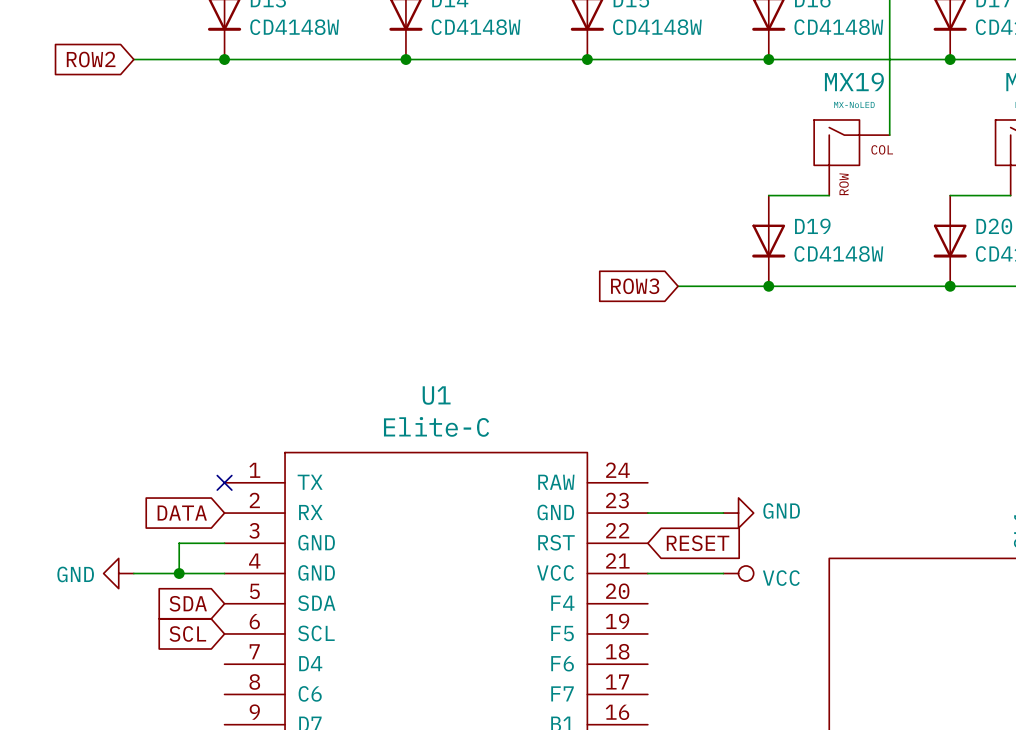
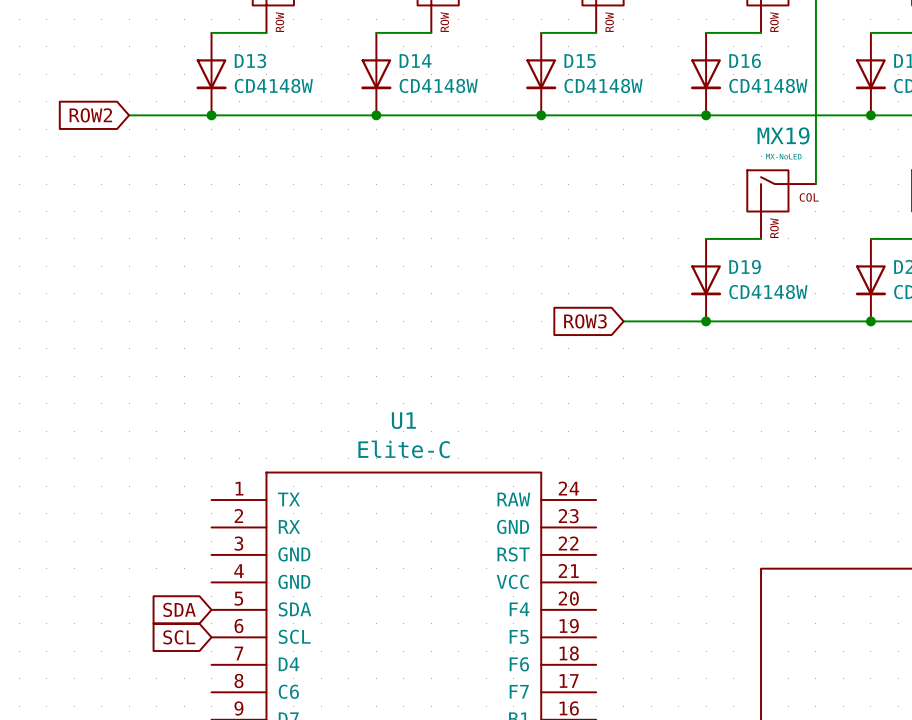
no-connect mark: (224, 482) -> none
global label: DATA (182, 513) -> none
wire: (647, 513) (723, 513) -> none
power symbol: GND (738, 513) -> none
wire: (224, 543) (179, 543) (179, 573) -> none
global label: RESET (698, 543) -> none
power symbol: GND (118, 573) -> none
wire: (133, 573) (224, 573) -> none
junction: (179, 573) -> none
wire: (647, 573) (723, 573) -> none
power symbol: VCC (738, 573) -> none

